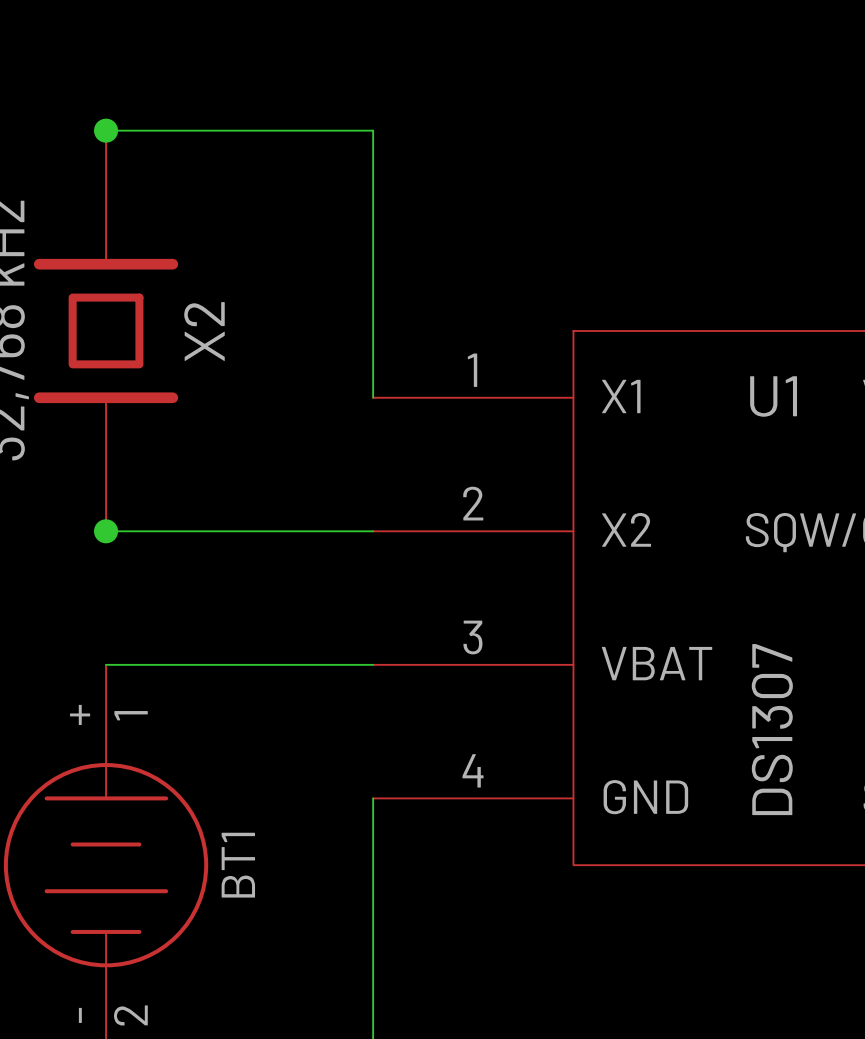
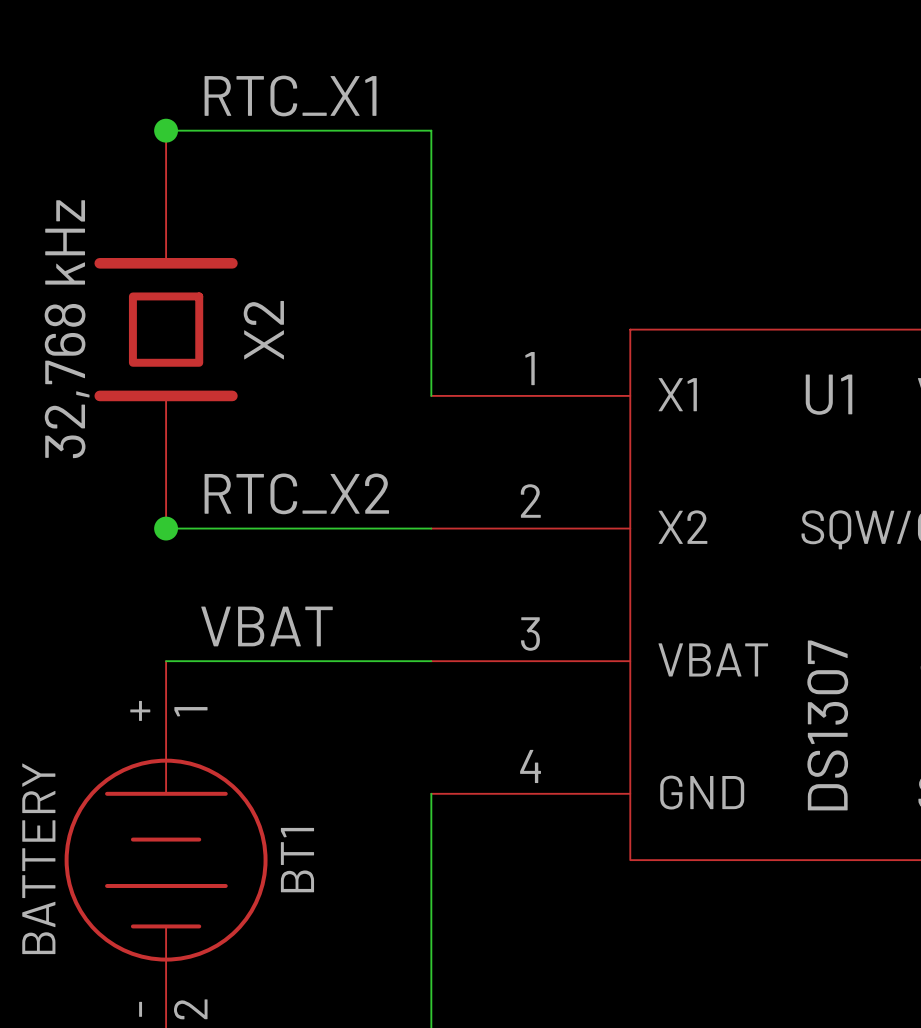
label: none -> RTC_X1 (290, 95)
label: none -> RTC_X2 (296, 493)
label: none -> VBAT (266, 626)

